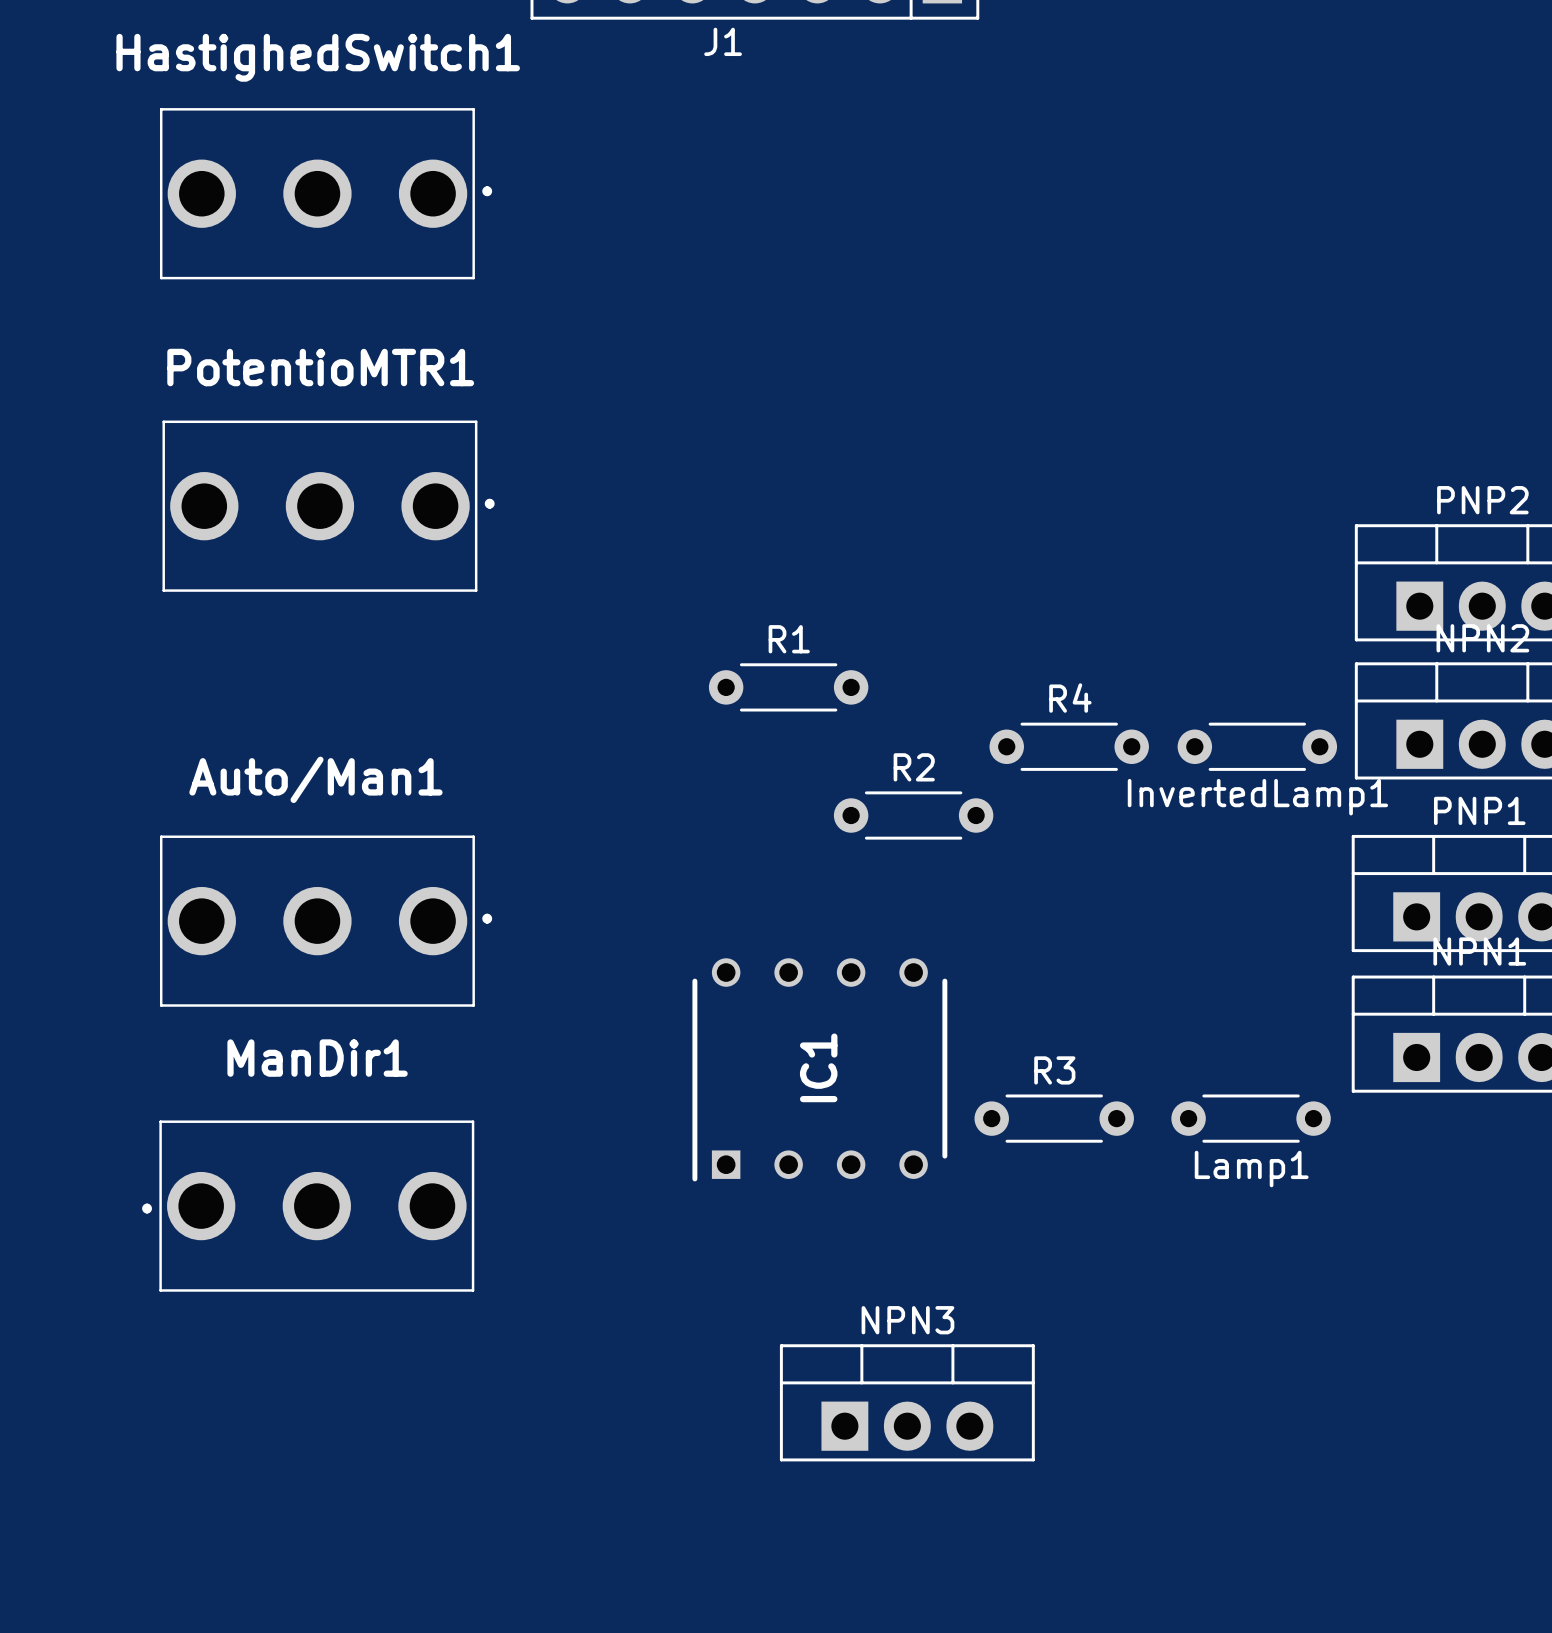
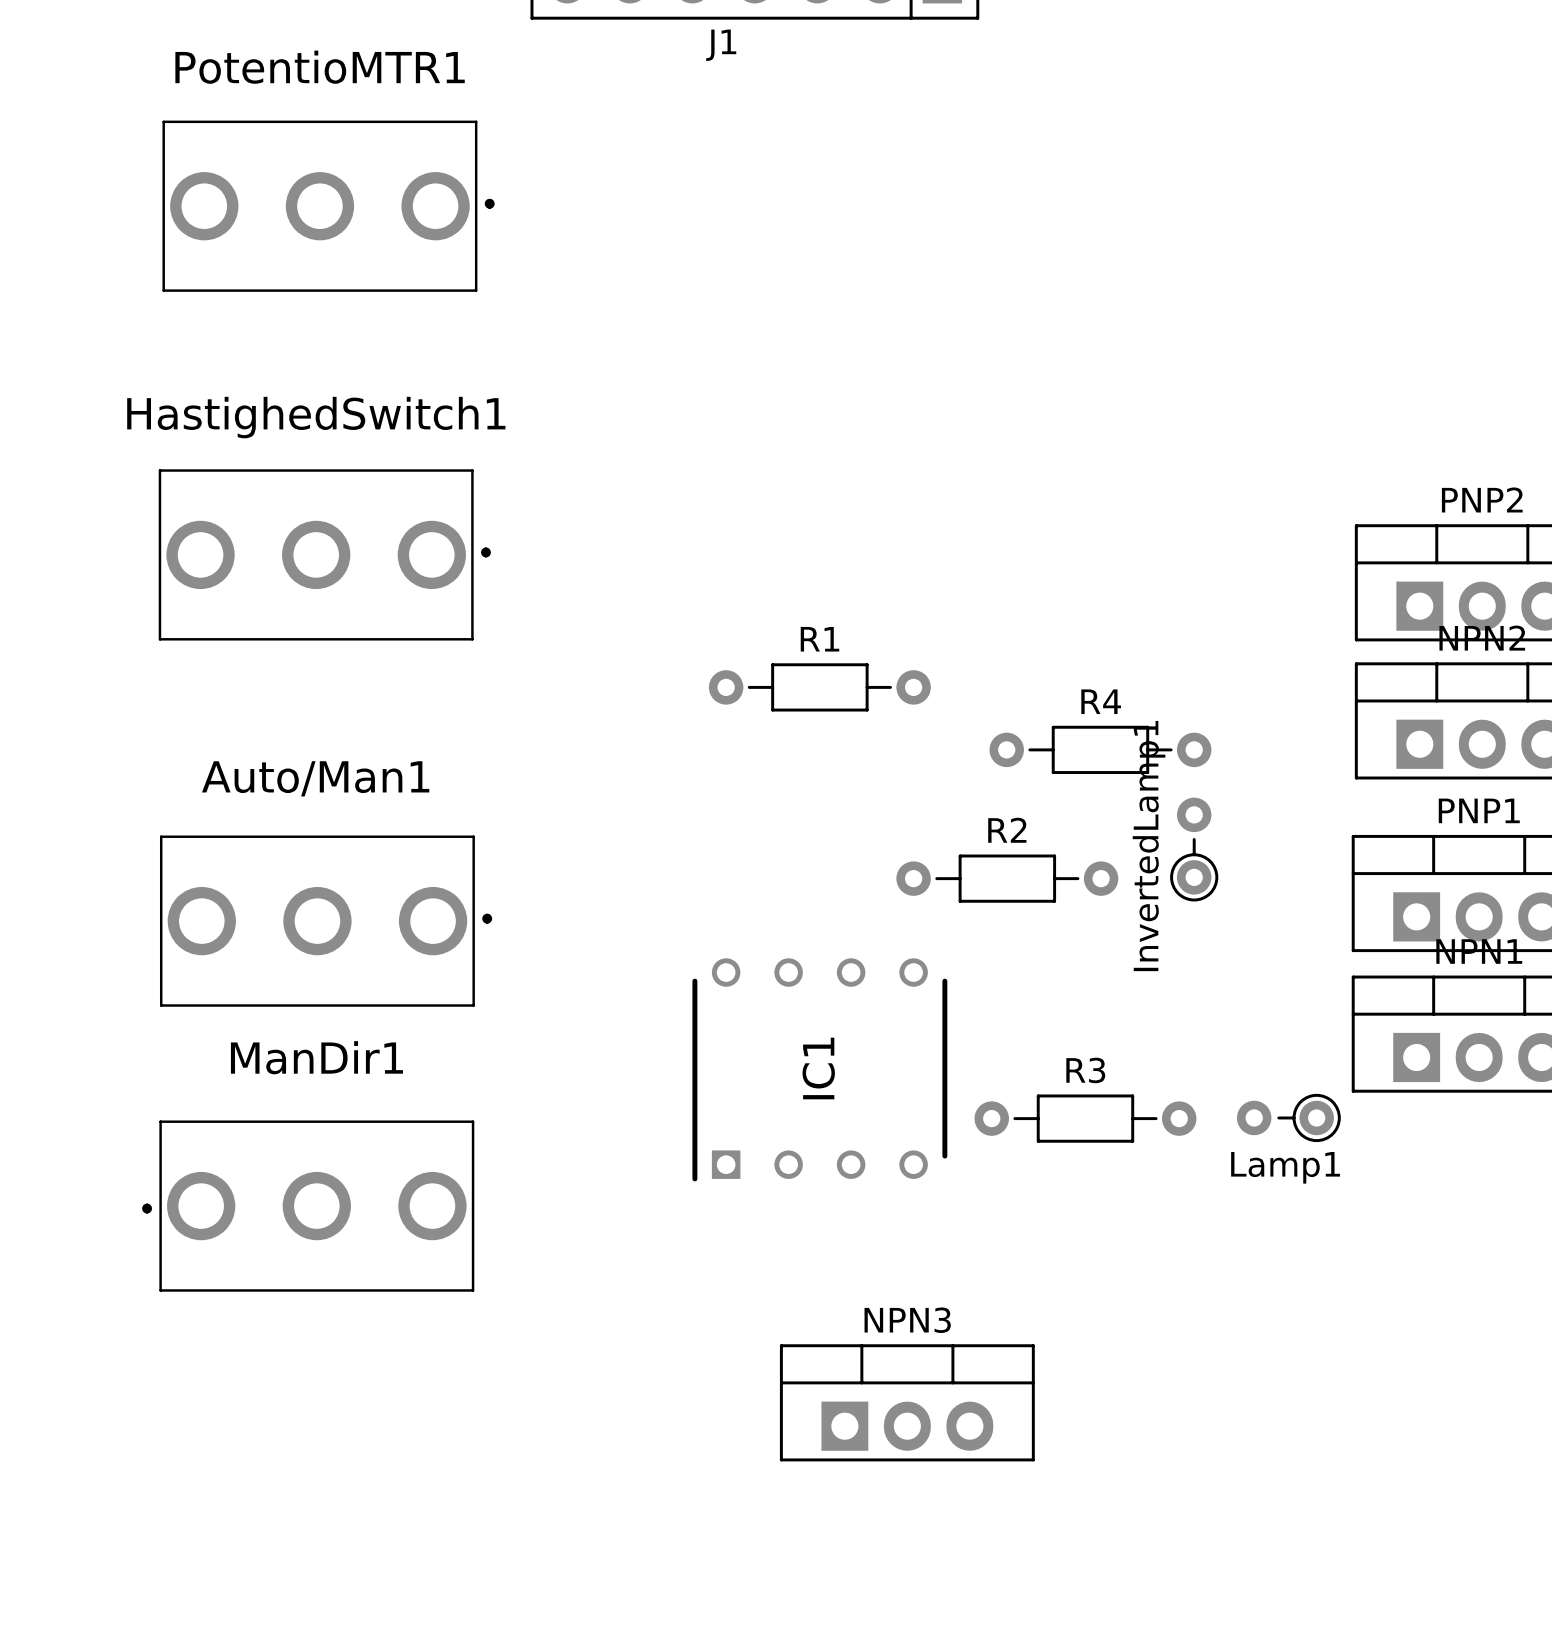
HastighedSwitch1 position: (326, 193) -> (324, 554)
PotentioMTR1 position: (328, 506) -> (328, 206)
R1 footprint: [708, 663, 869, 712] -> [708, 663, 931, 712]
R4 footprint: [989, 722, 1149, 771] -> [989, 725, 1212, 775]
InvertedLamp1 footprint: [1177, 722, 1338, 771] -> [1170, 797, 1219, 902]
R2 footprint: [833, 791, 994, 840] -> [896, 854, 1119, 903]
InvertedLamp1 name position: InvertedLamp1 (1257, 797) -> InvertedLamp1 (1149, 846)
R3 footprint: [974, 1094, 1134, 1143] -> [974, 1094, 1197, 1143]
Lamp1 footprint: [1171, 1094, 1331, 1143] -> [1236, 1093, 1341, 1143]

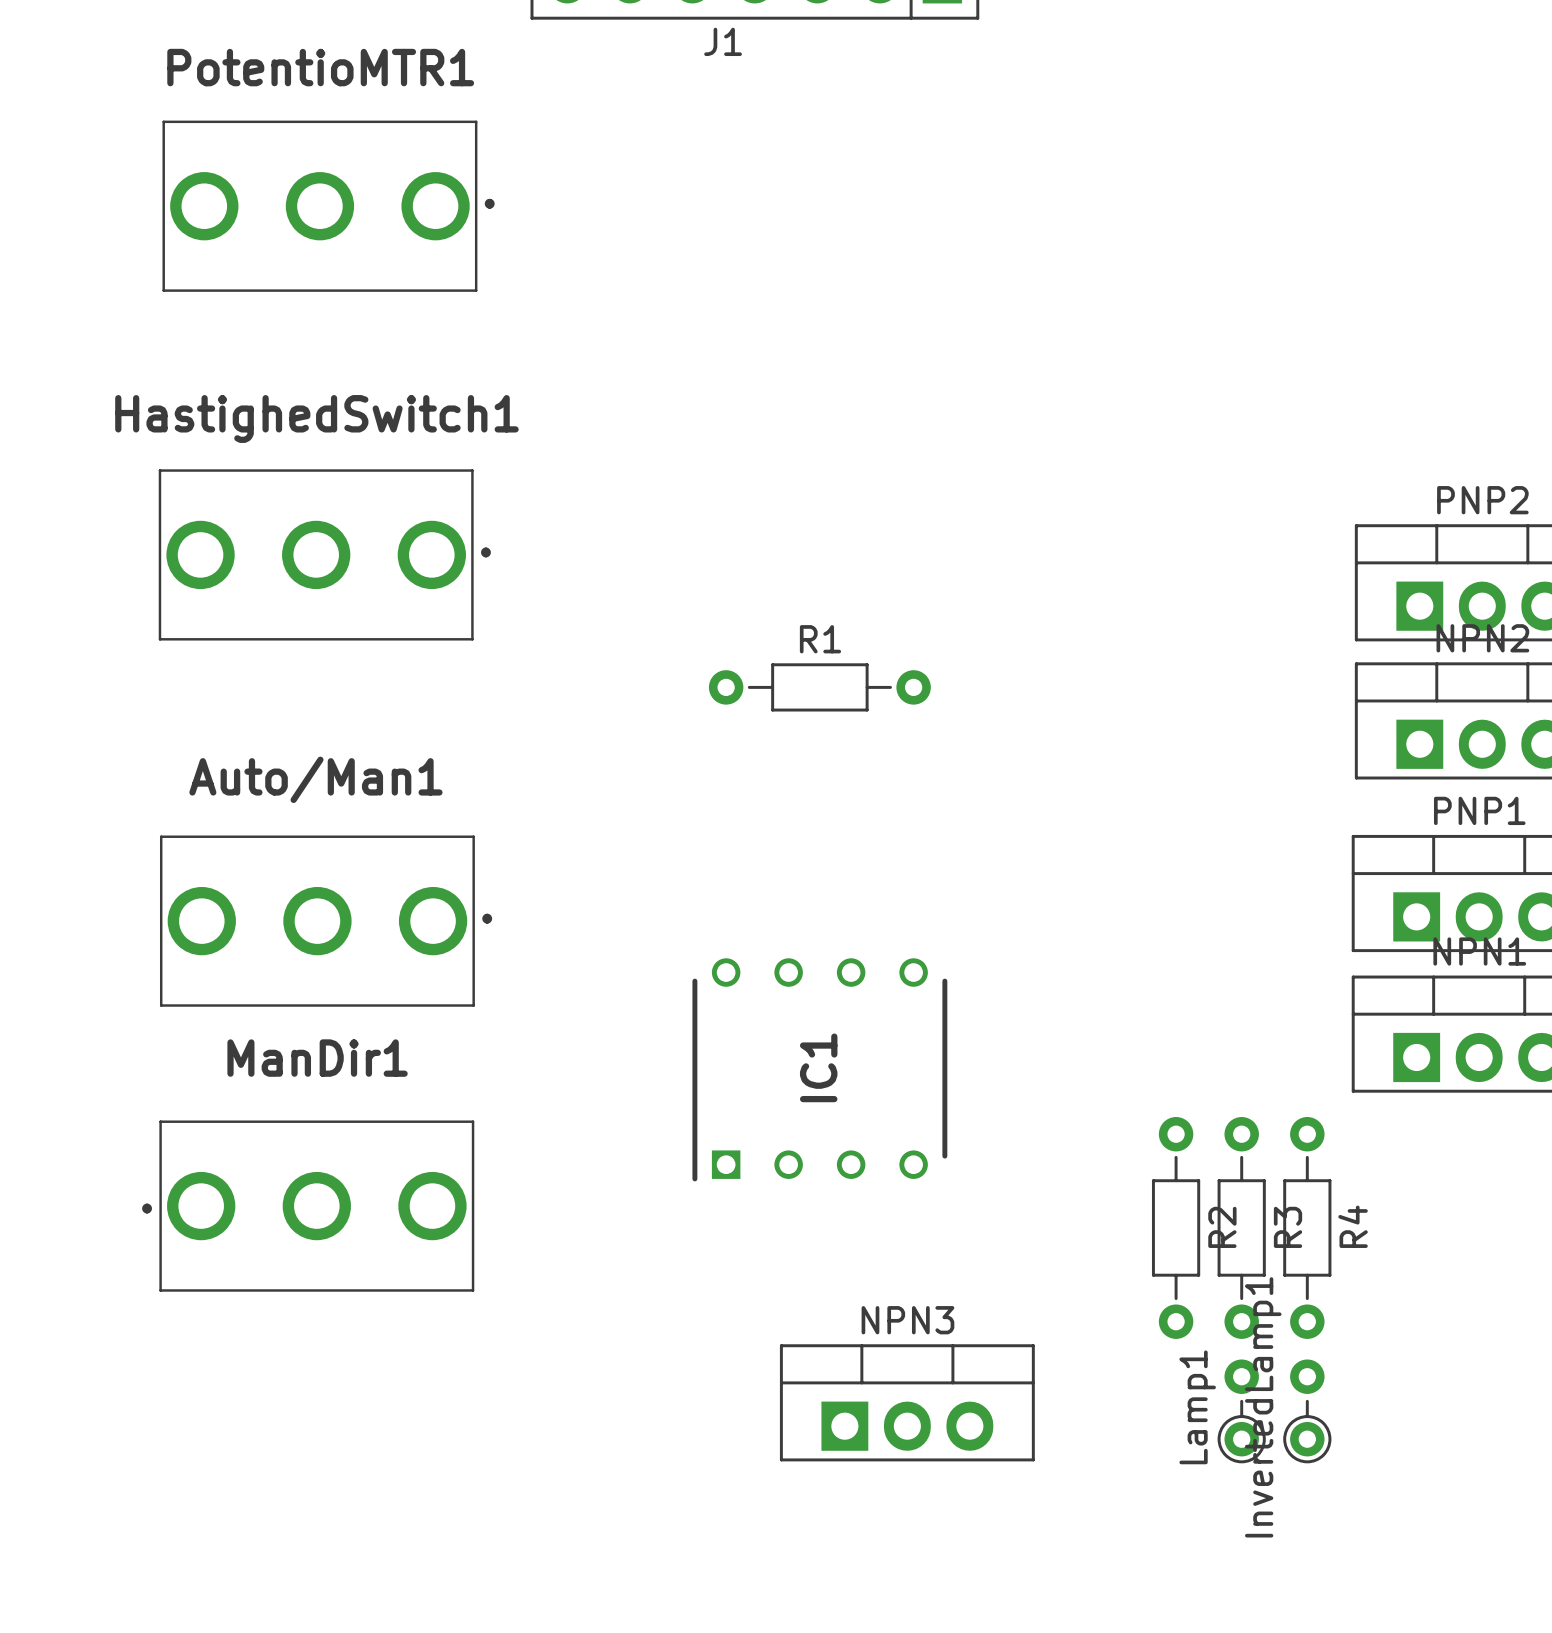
R4 rotation: 0° (1100, 749) -> 90° clockwise (1307, 1227)
R4 position: (1100, 749) -> (1307, 1227)
InvertedLamp1 position: (1194, 849) -> (1307, 1411)
R2 rotation: 0° (1007, 878) -> 90° clockwise (1176, 1227)
R2 position: (1007, 878) -> (1176, 1227)
Lamp1 rotation: 0° (1288, 1117) -> 90° clockwise (1241, 1411)
Lamp1 position: (1288, 1117) -> (1241, 1411)
R3 rotation: 0° (1085, 1118) -> 90° clockwise (1241, 1227)
R3 position: (1085, 1118) -> (1241, 1227)

